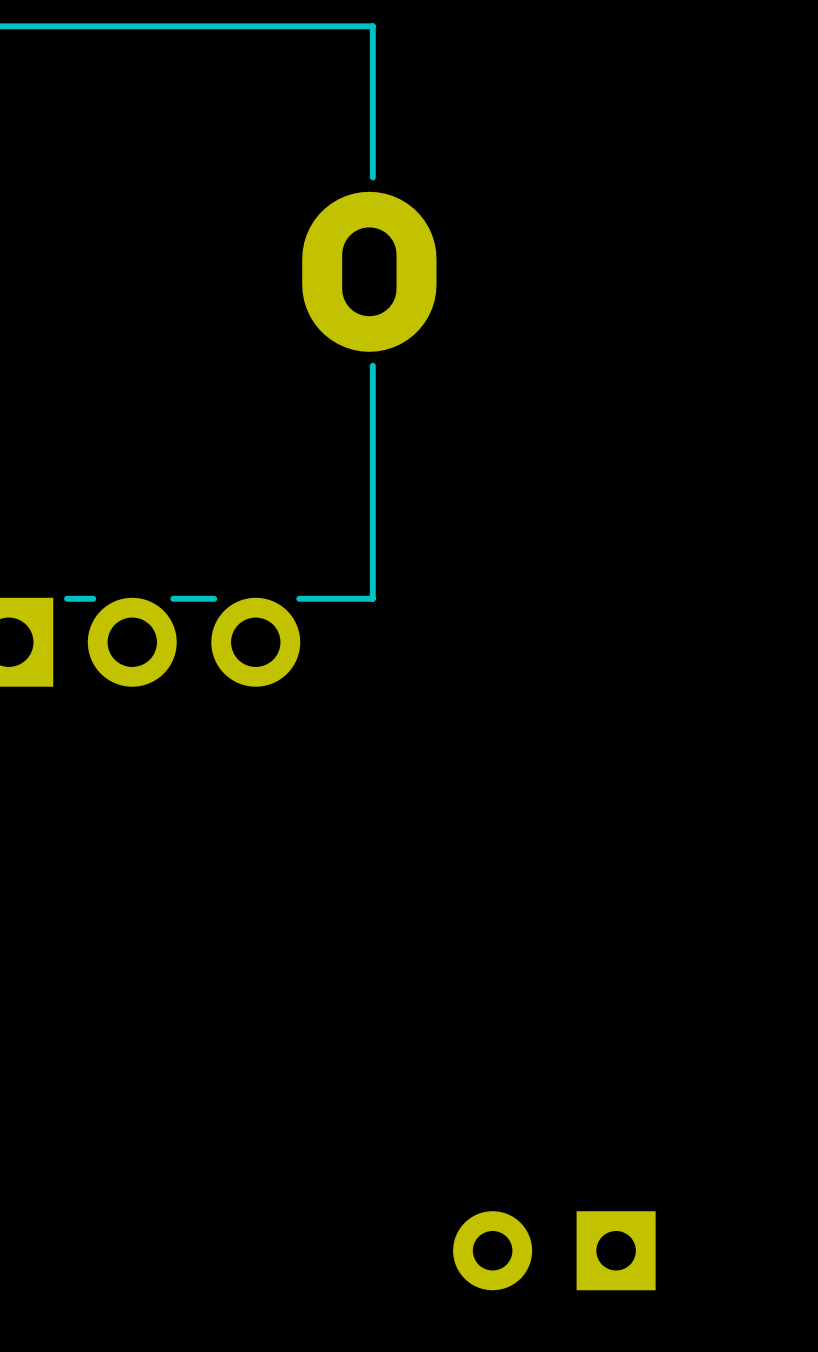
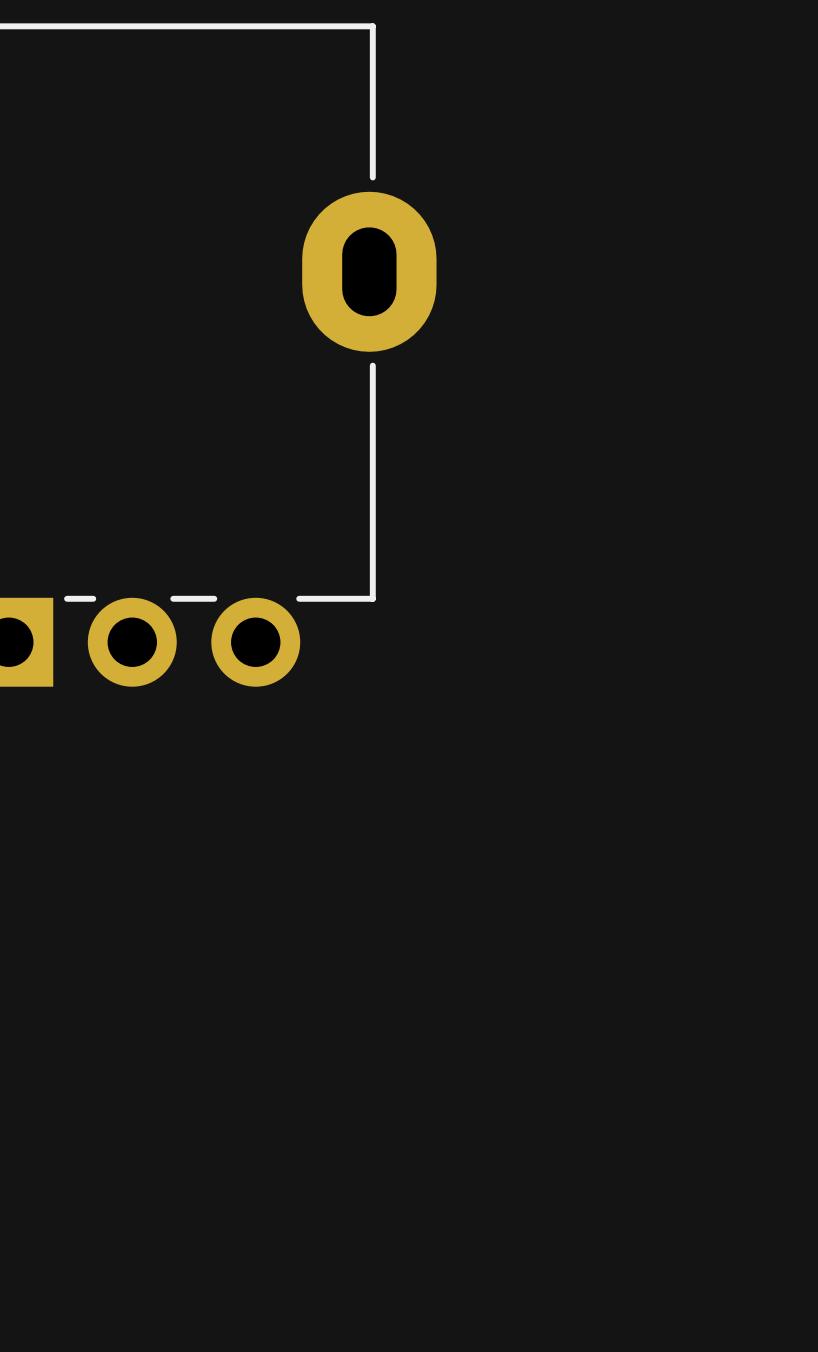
part: (554, 1250) -> none

